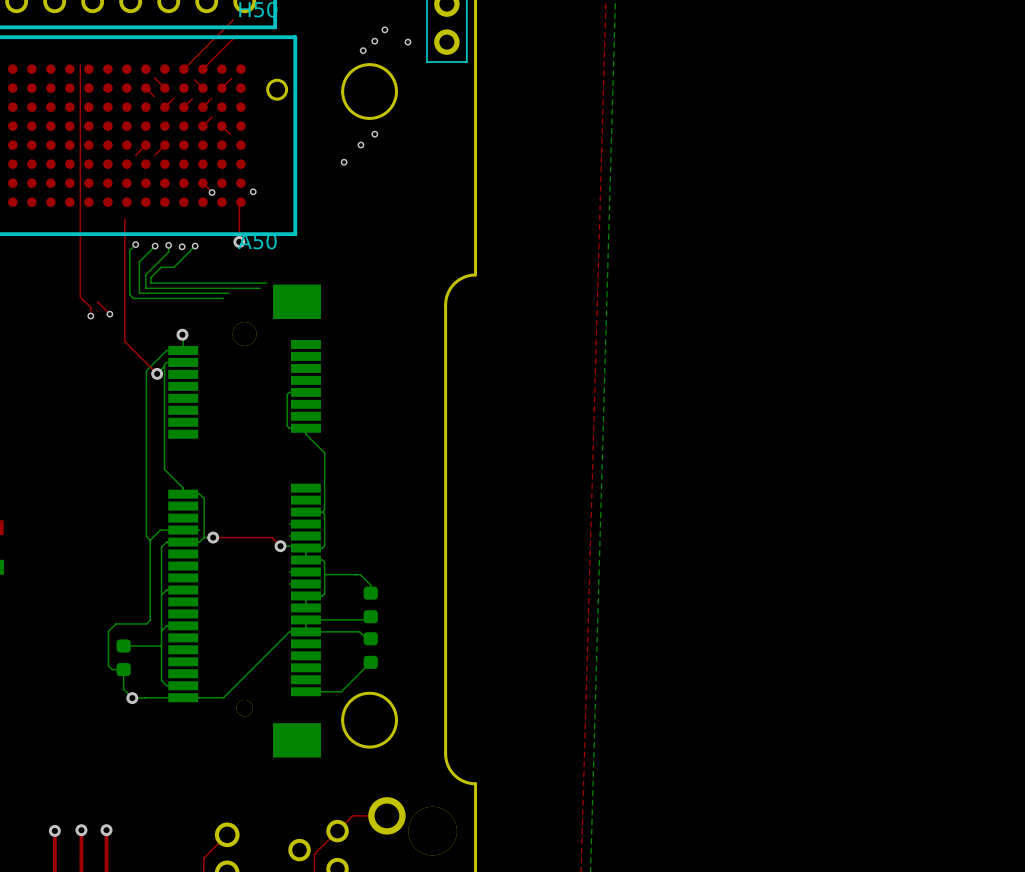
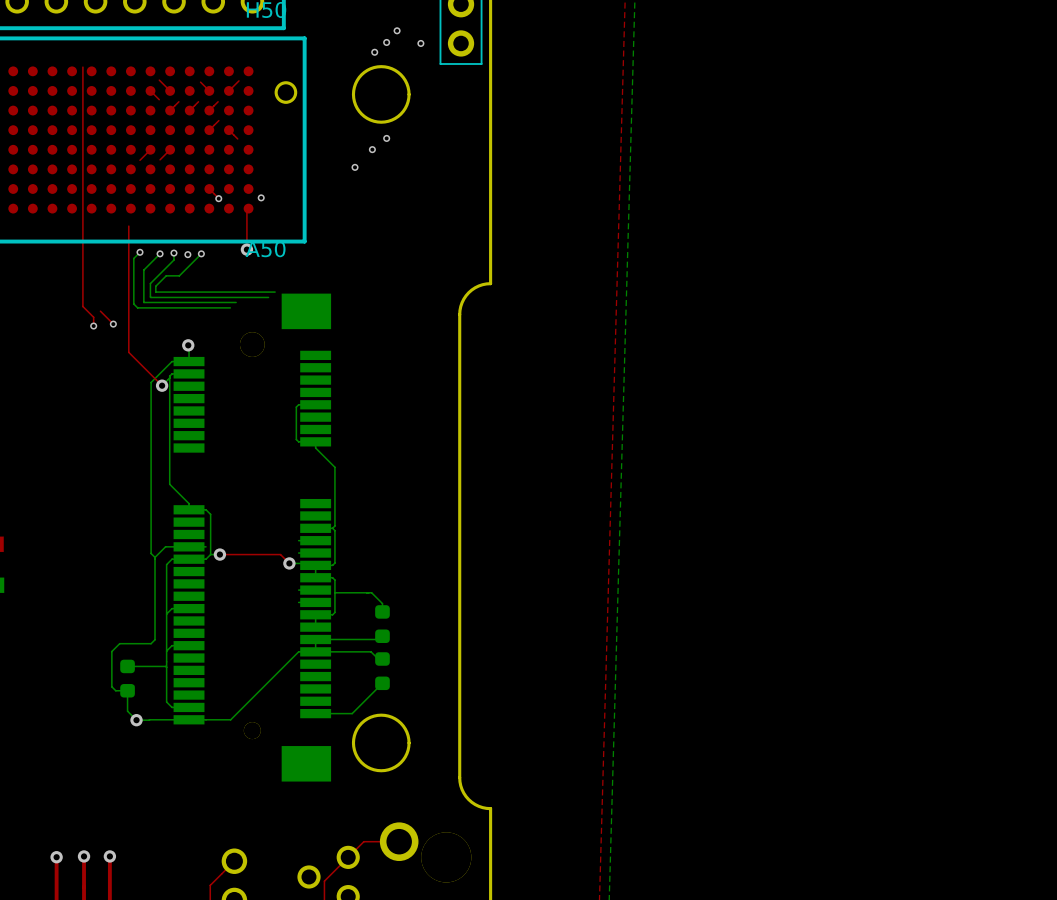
top track: (233, 19) (183, 69) -> none
top track: (236, 35) (202, 69) -> none

